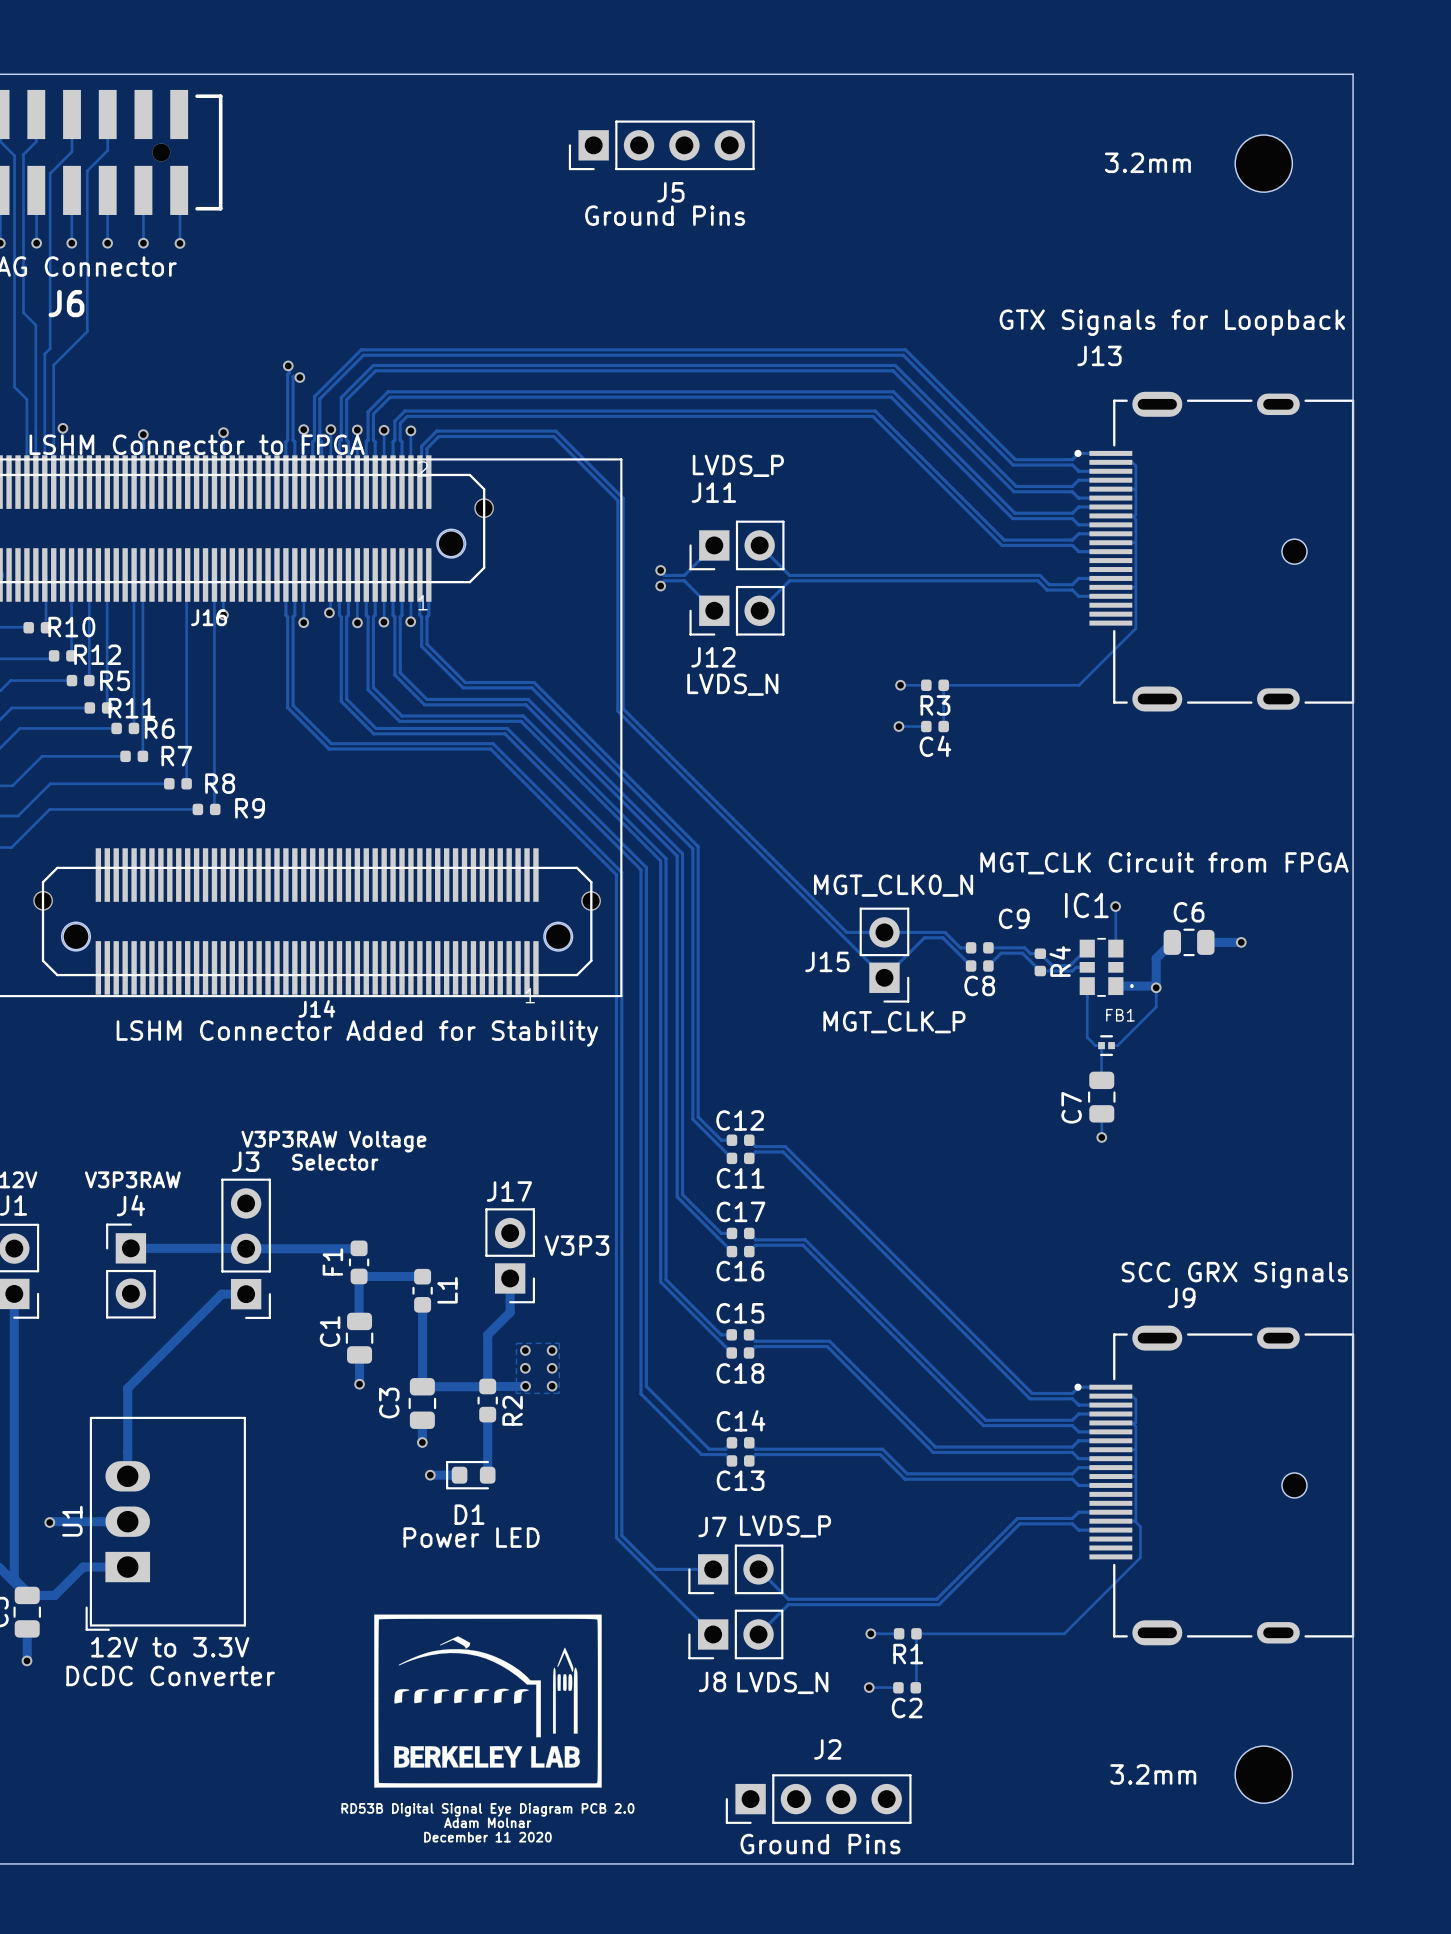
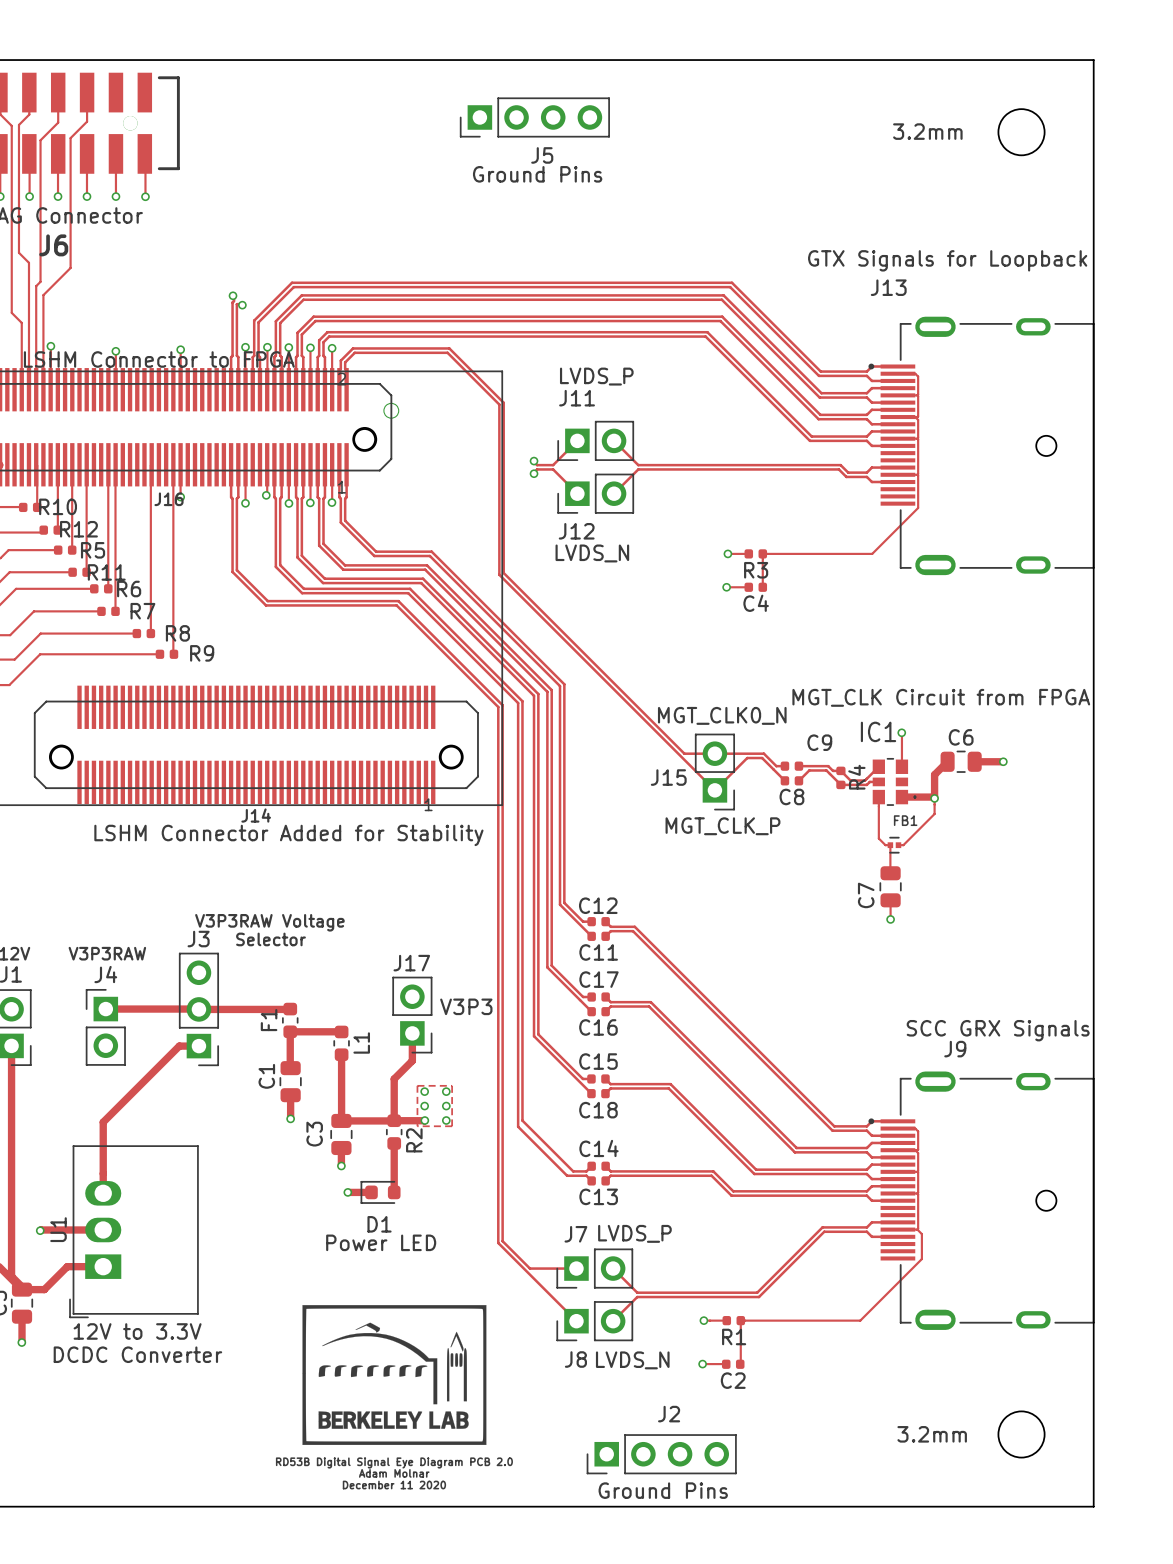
via: (43, 900) -> none
via: (591, 900) -> none

